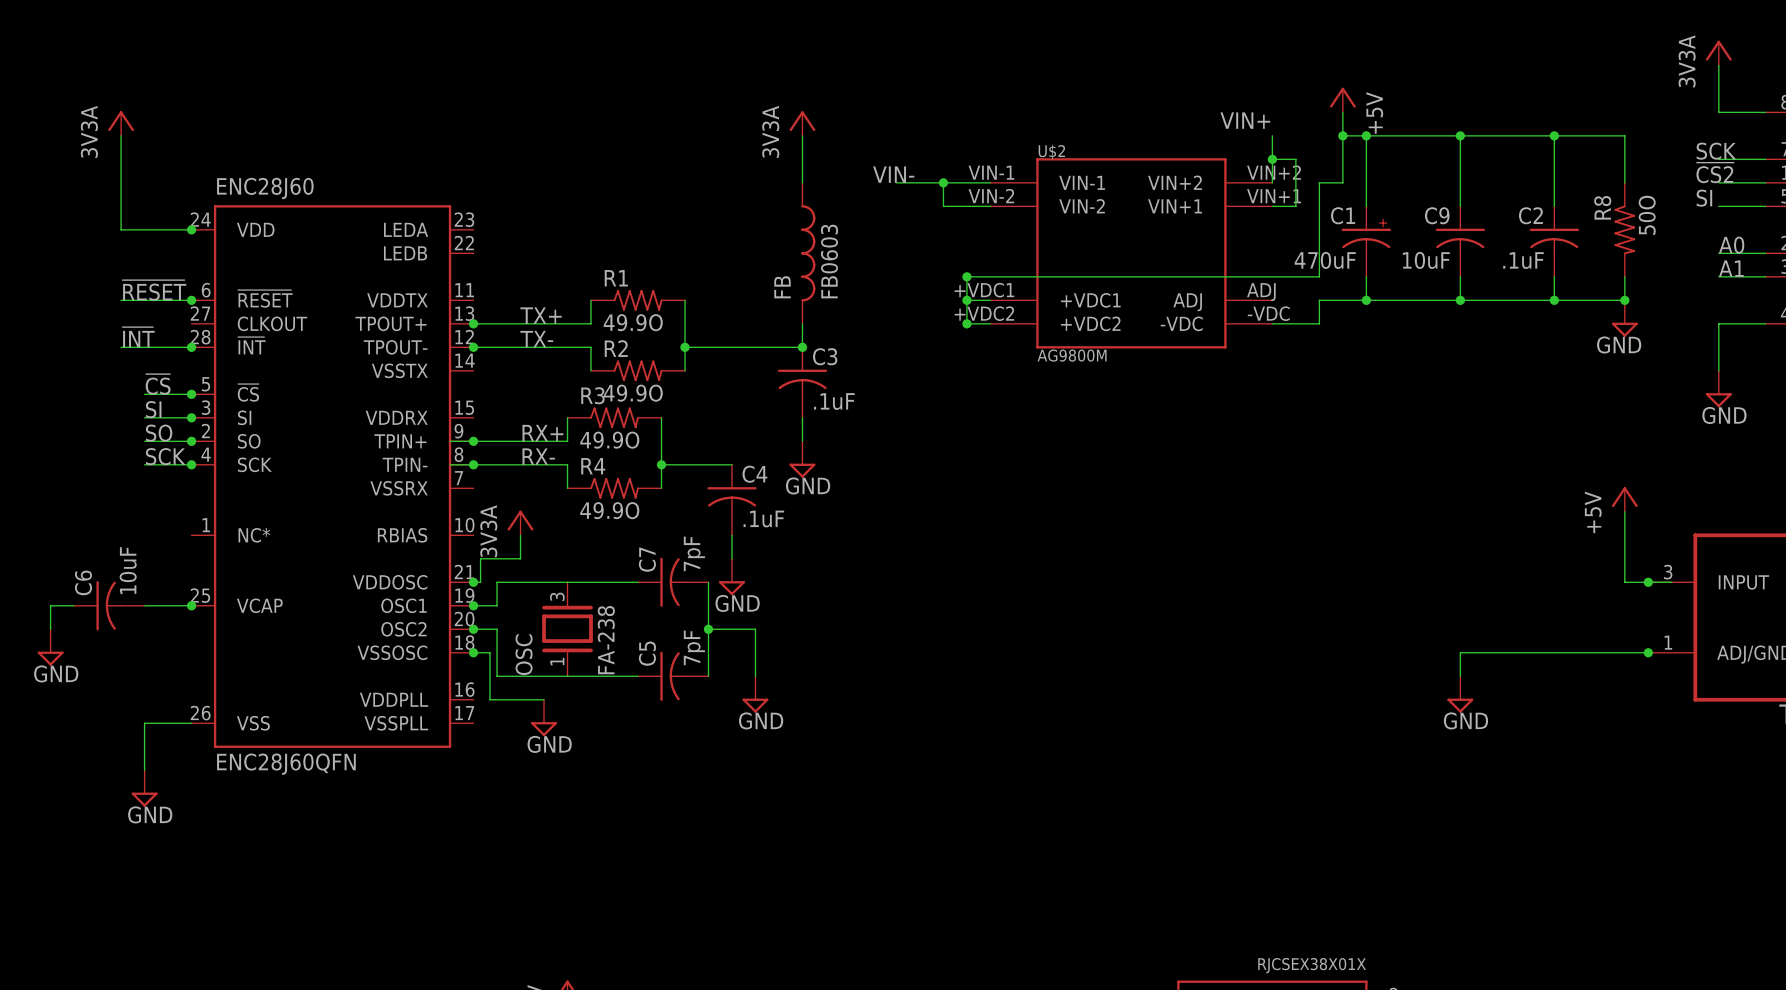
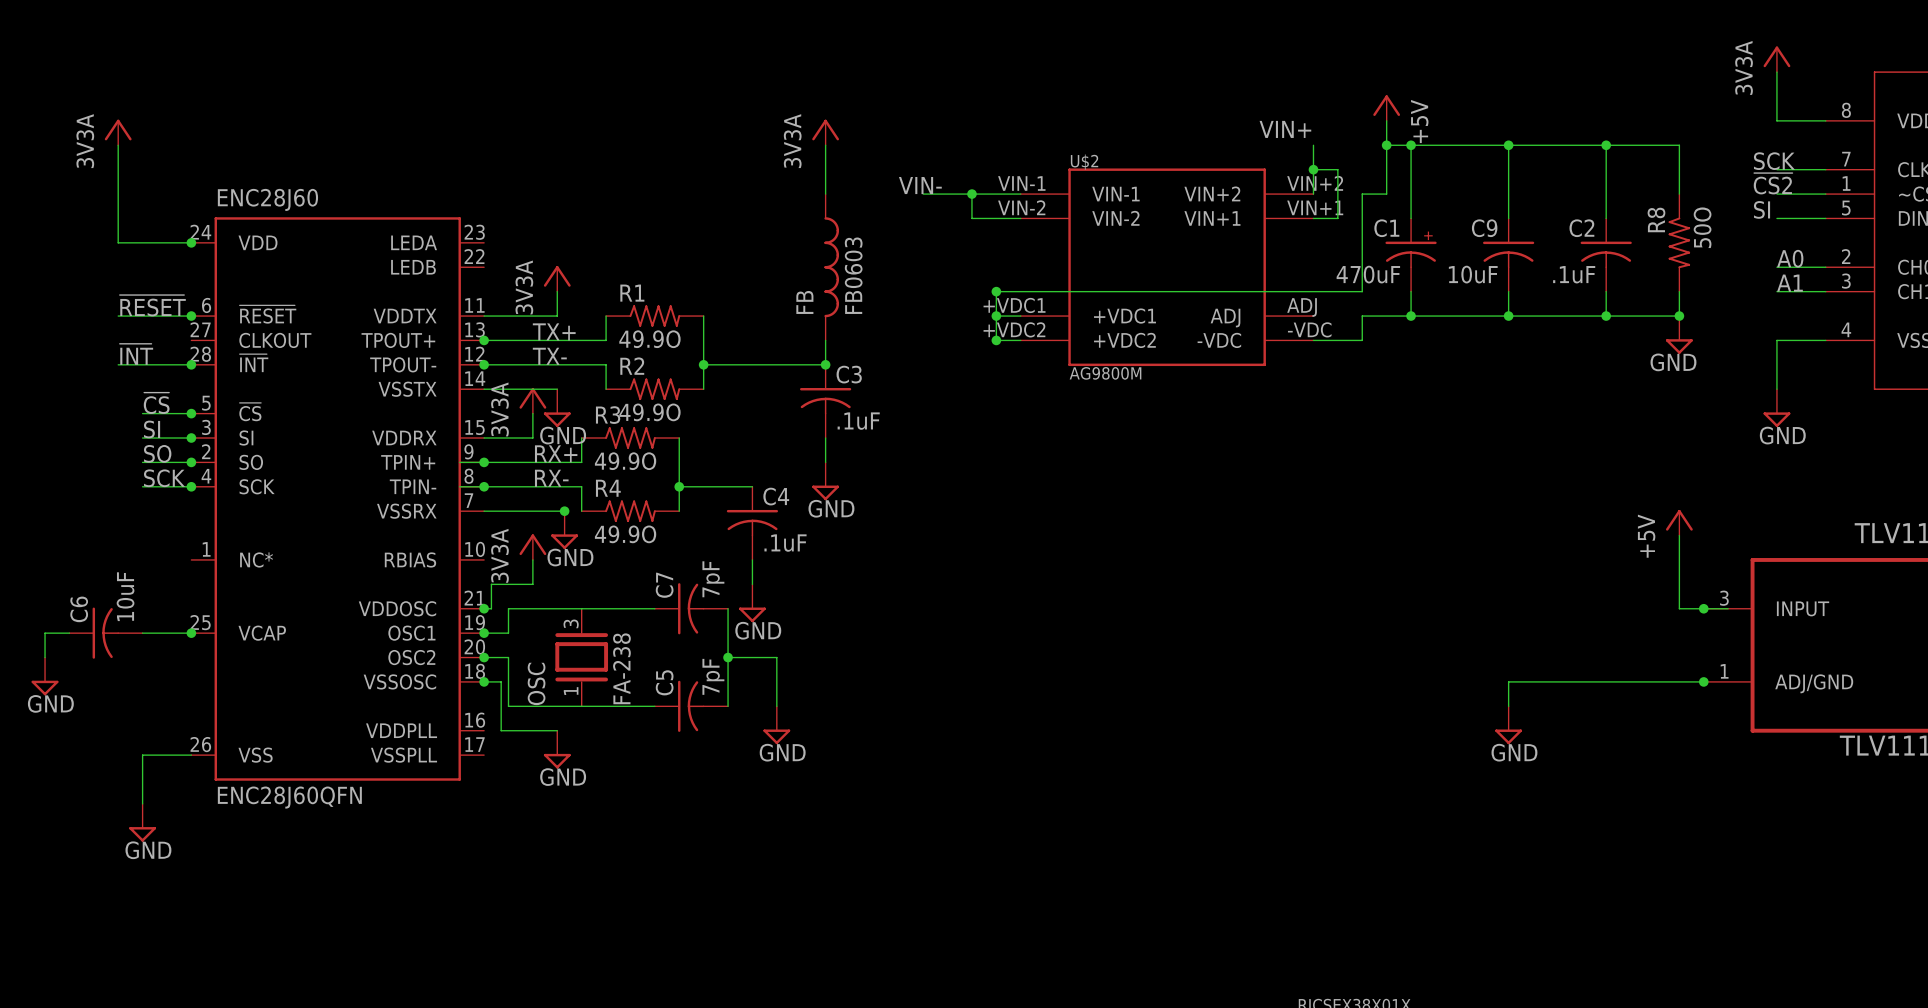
power symbol: none -> 3V3A (557, 278)
wire: none -> (557, 291) (557, 316) (484, 316)
wire: none -> (484, 389) (557, 389)
power symbol: none -> 3V3A (532, 400)
power symbol: none -> GND (557, 408)
wire: none -> (532, 413) (532, 438) (484, 438)
wire: none -> (484, 511) (567, 511)
junction: none -> (564, 511)
power symbol: none -> GND (564, 530)

